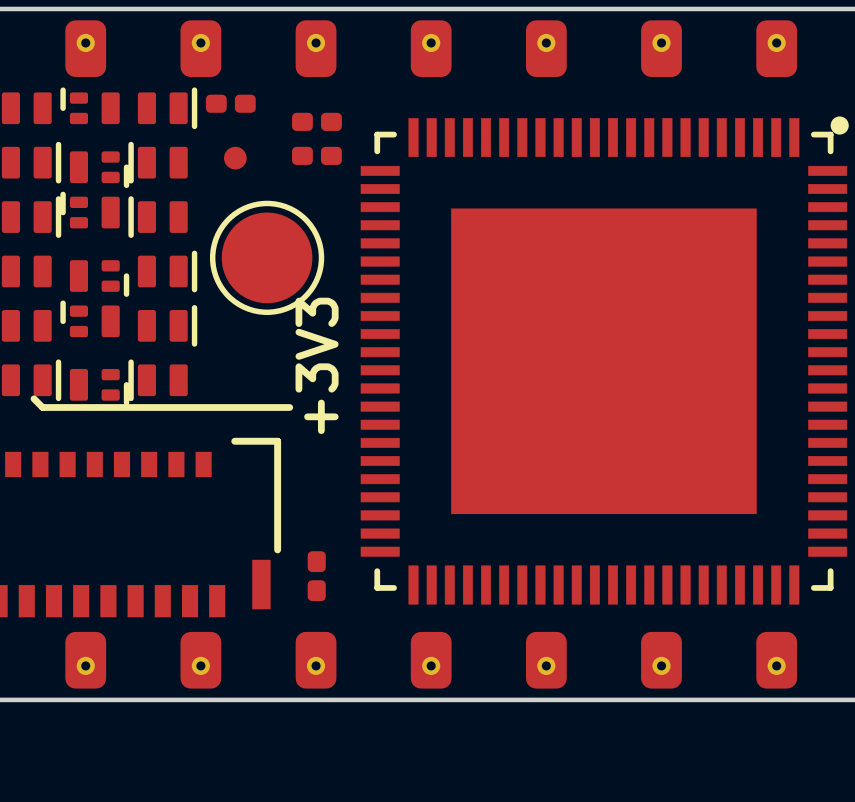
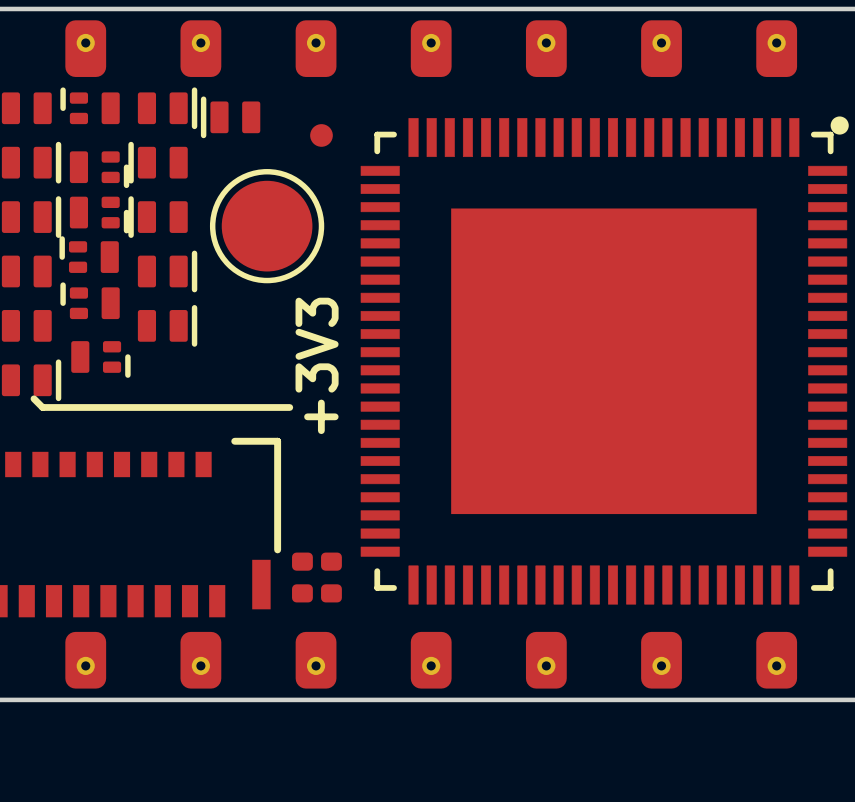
part footprint: [205, 94, 256, 113] -> [200, 96, 261, 139]
part: (316, 121) -> none
part: (316, 155) -> none
part position: (235, 158) -> (321, 135)
part rotation: 0° (90, 210) -> 180° (99, 215)
part: none -> (89, 254)
part position: (267, 257) -> (267, 226)
part: (99, 278) -> none
part: none -> (90, 300)
part: (90, 318) -> none
part: none -> (100, 359)
part: (158, 380) -> none
part: (99, 387) -> none
part: none -> (316, 561)
part: (316, 576) -> none
part: none -> (316, 593)

